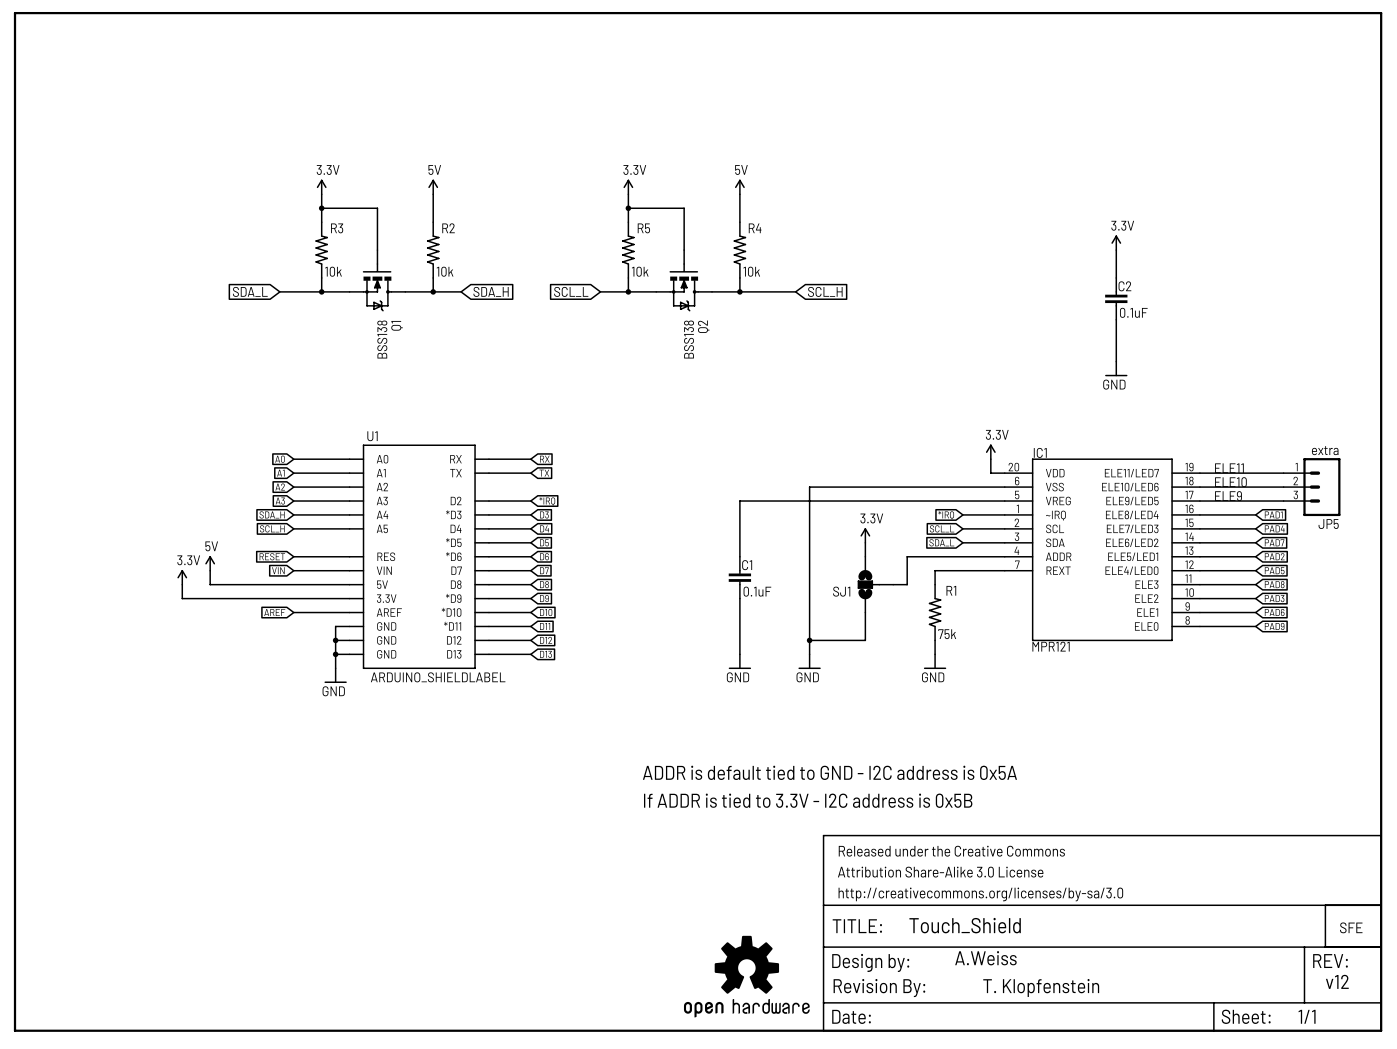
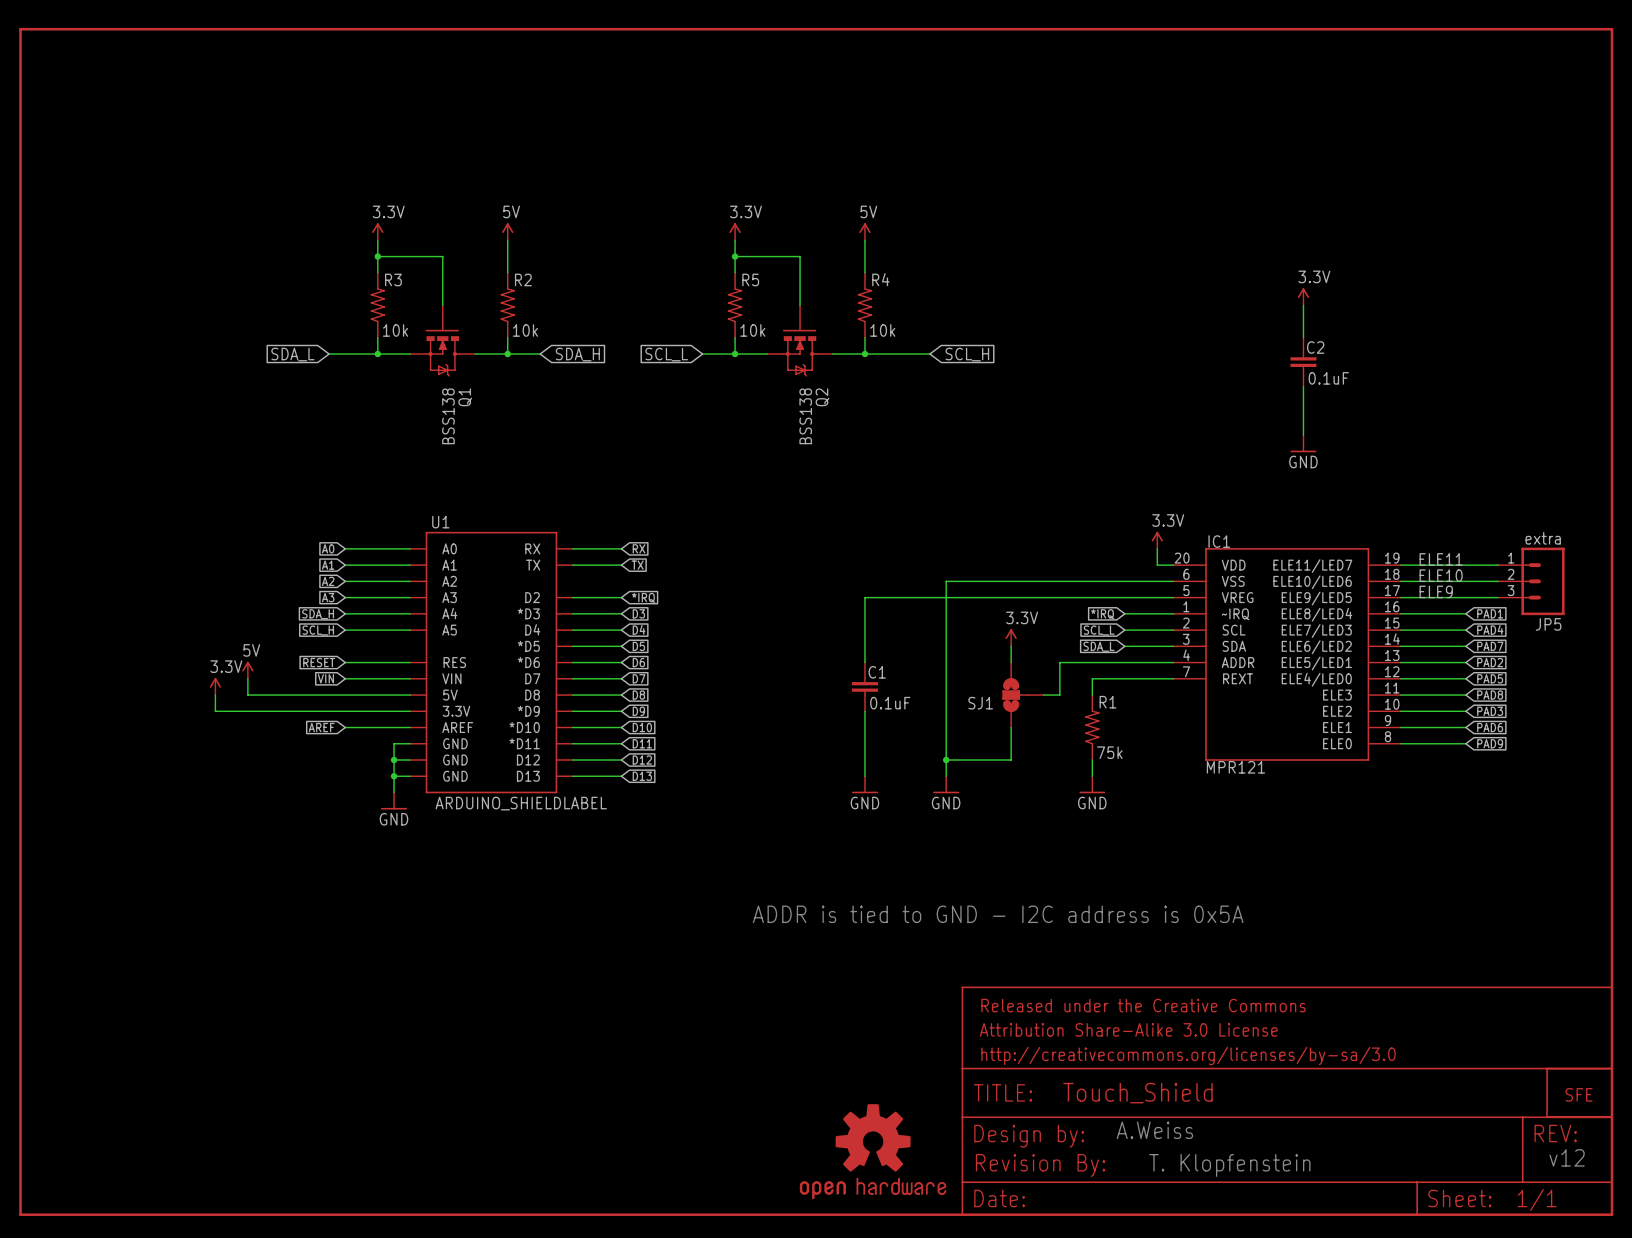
text: ADDR is default tied to GND - I2C address is 0x5A (829, 772) -> ADDR is tied to GND - I2C address is 0x5A (998, 914)
text: If ADDR is tied to 3.3V - I2C address is 0x5B (808, 800) -> none

